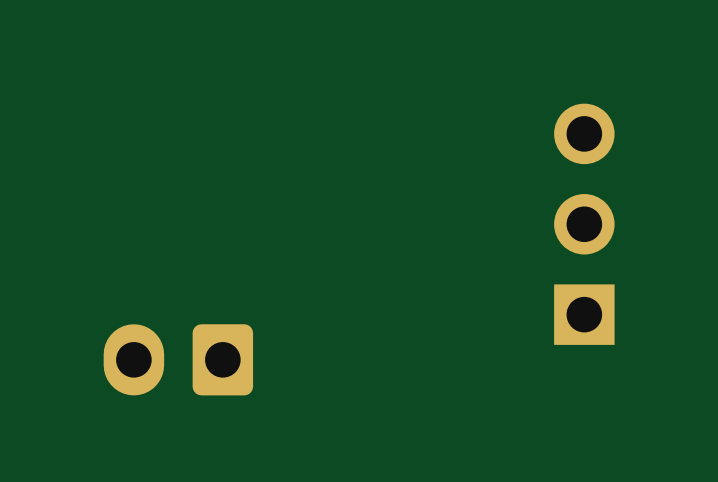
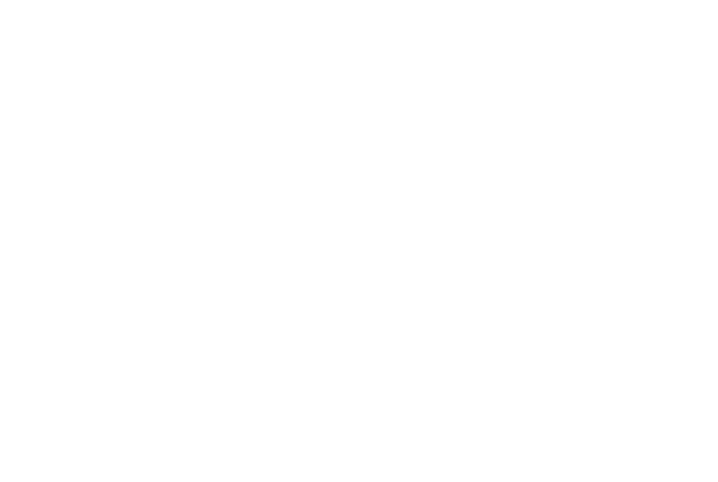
part: (584, 224) -> none
part: (178, 359) -> none

